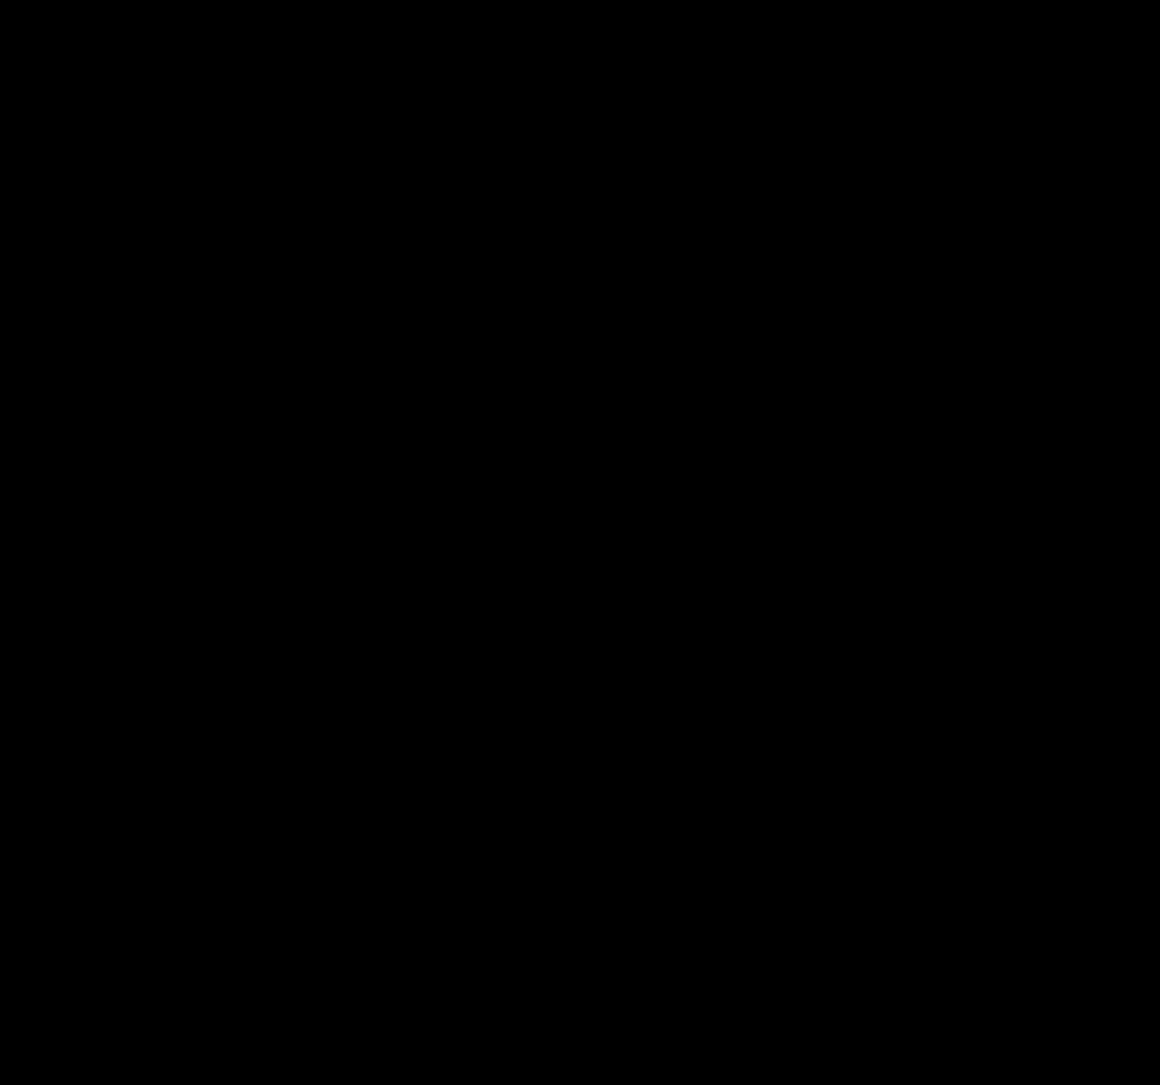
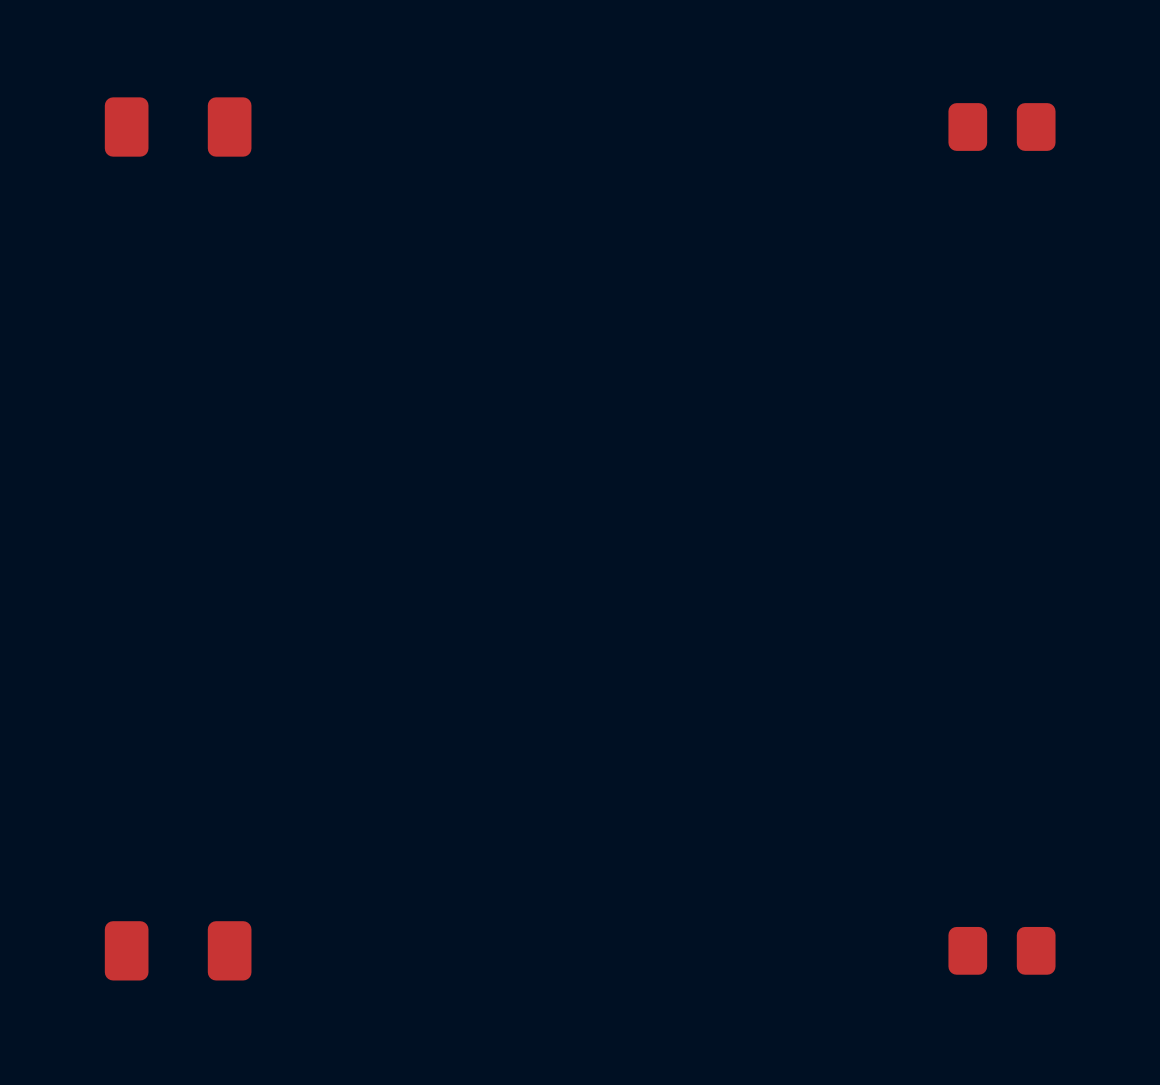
part: none -> (178, 127)
part: none -> (1001, 127)
part: none -> (178, 950)
part: none -> (1001, 950)

